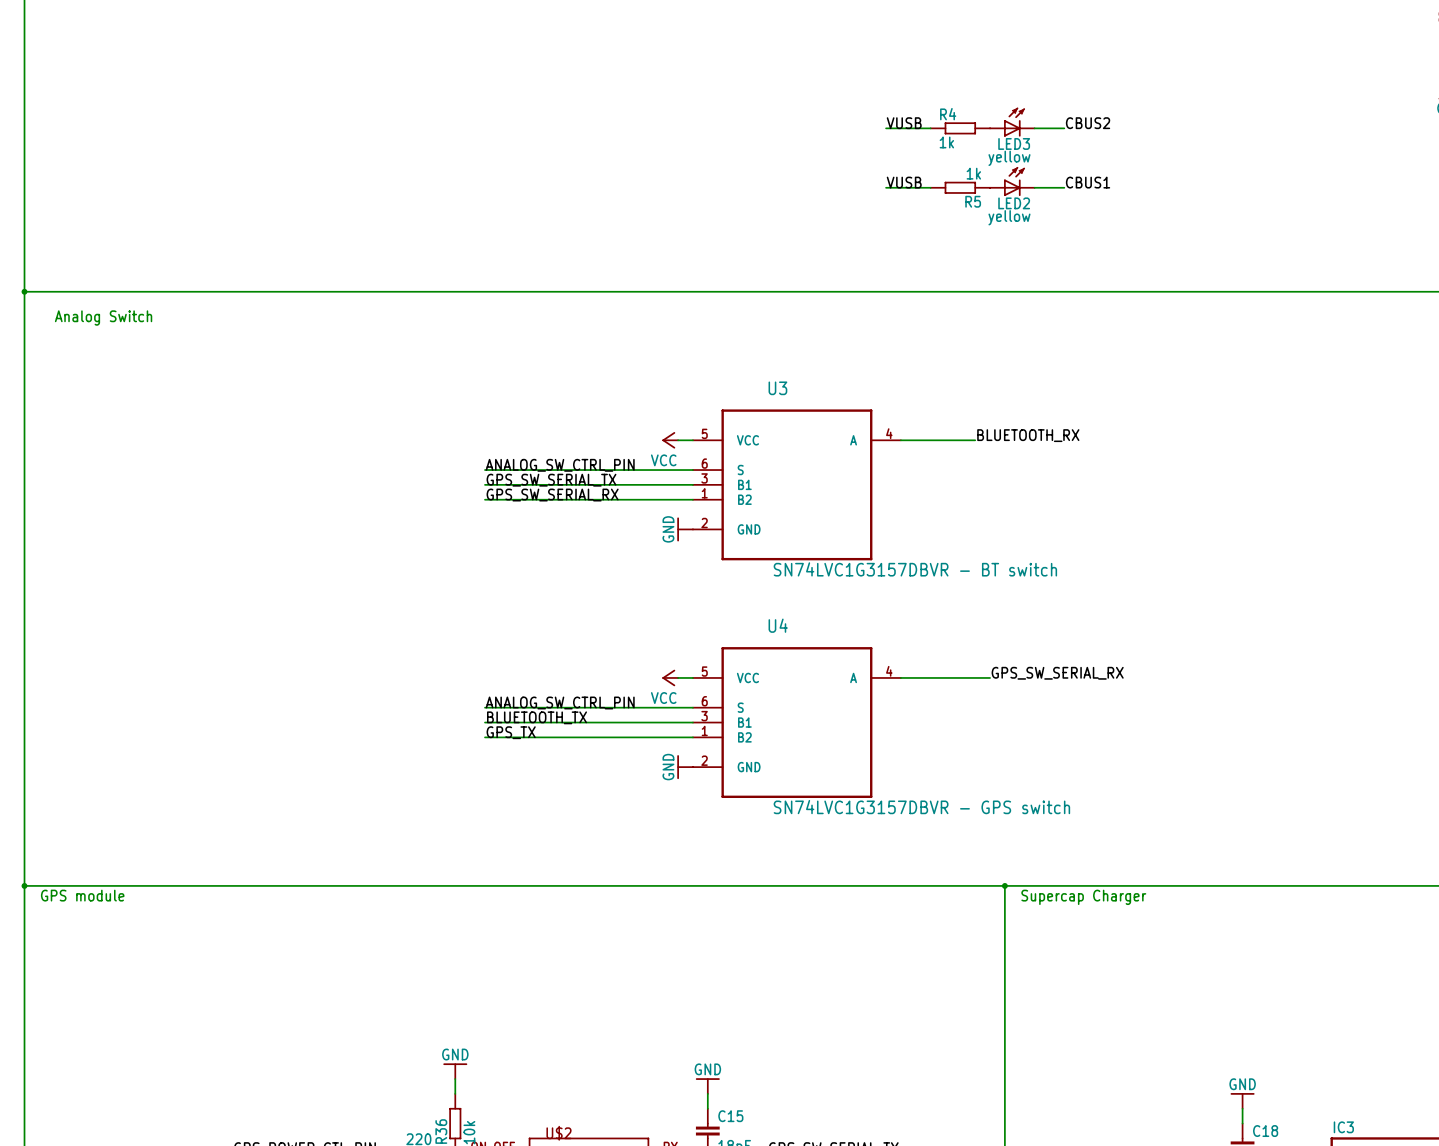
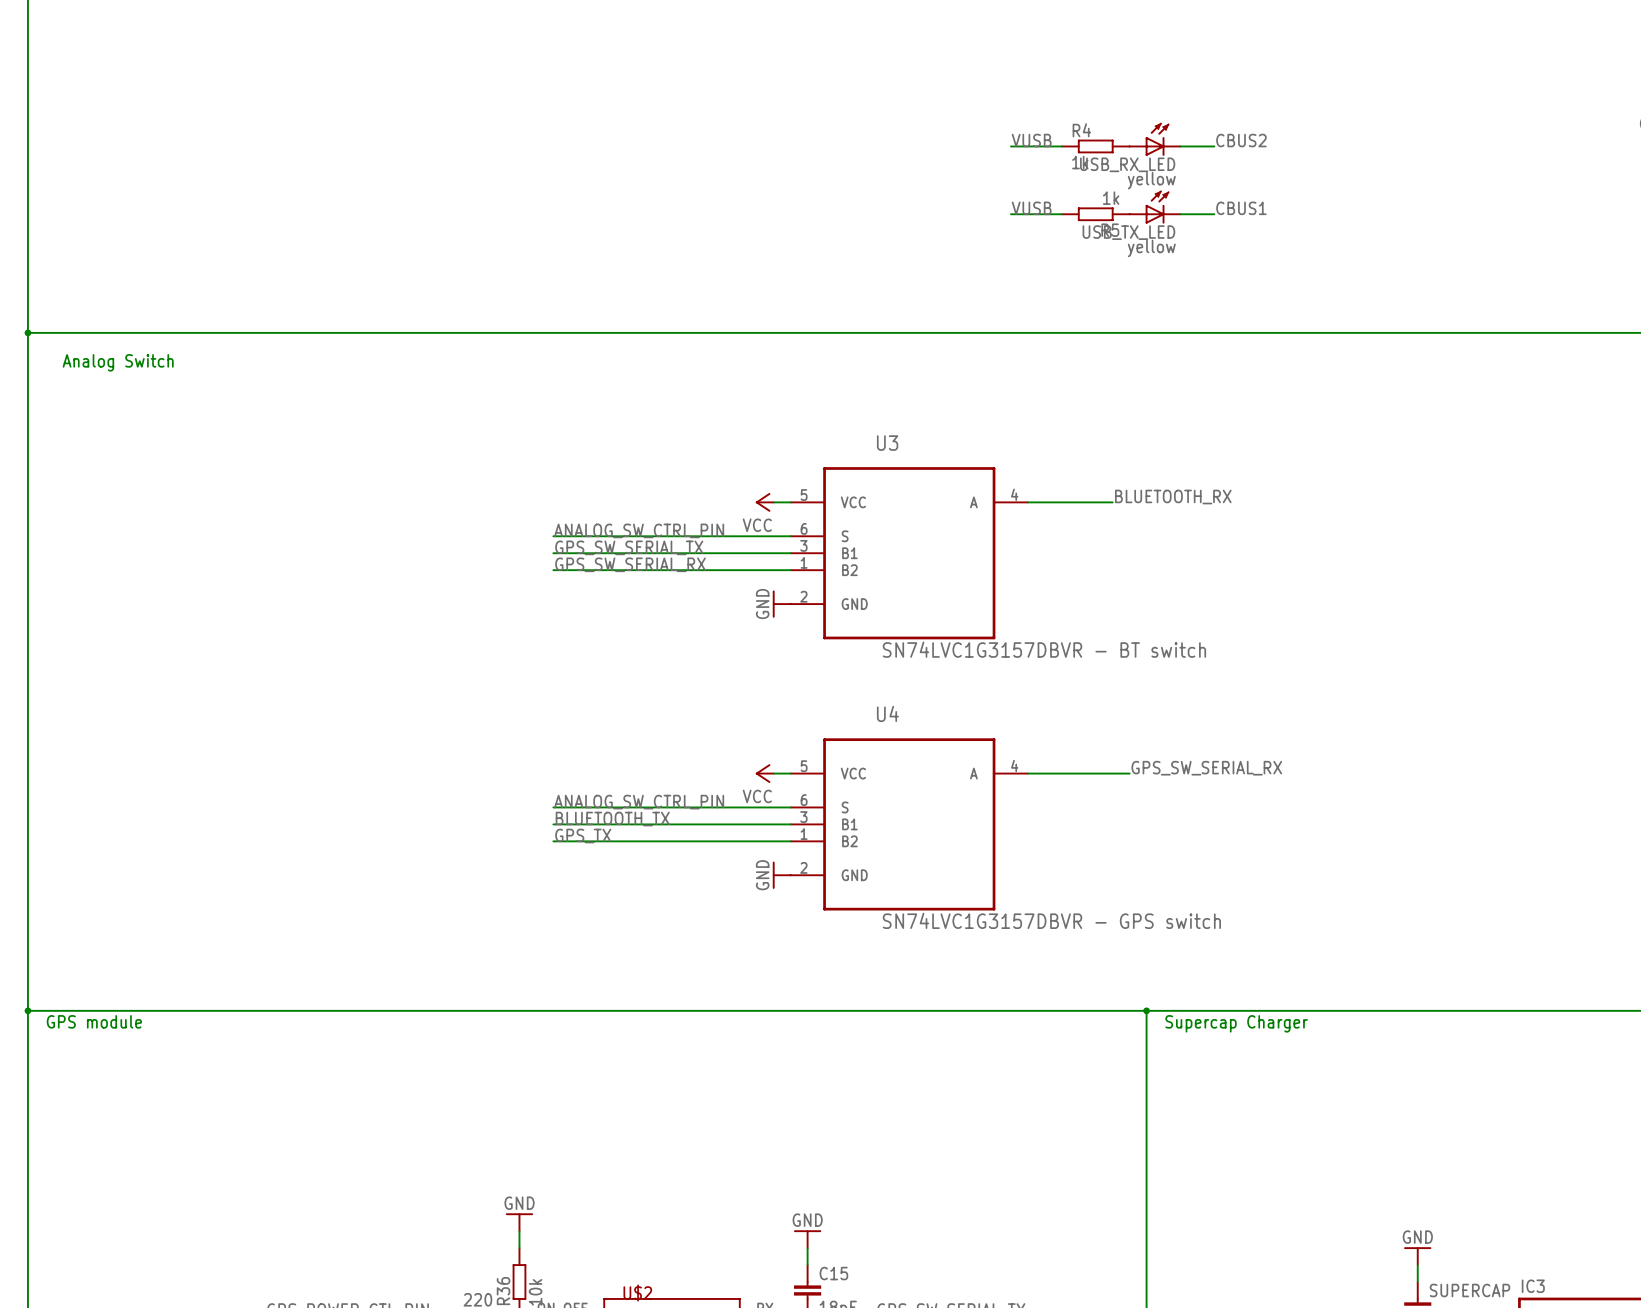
LED3 name: LED3 (1014, 143) -> USB_RX_LED (1127, 164)
LED2 name: LED2 (1014, 203) -> USB_TX_LED (1128, 232)
C18 name: C18 (1265, 1131) -> SUPERCAP (1469, 1290)

